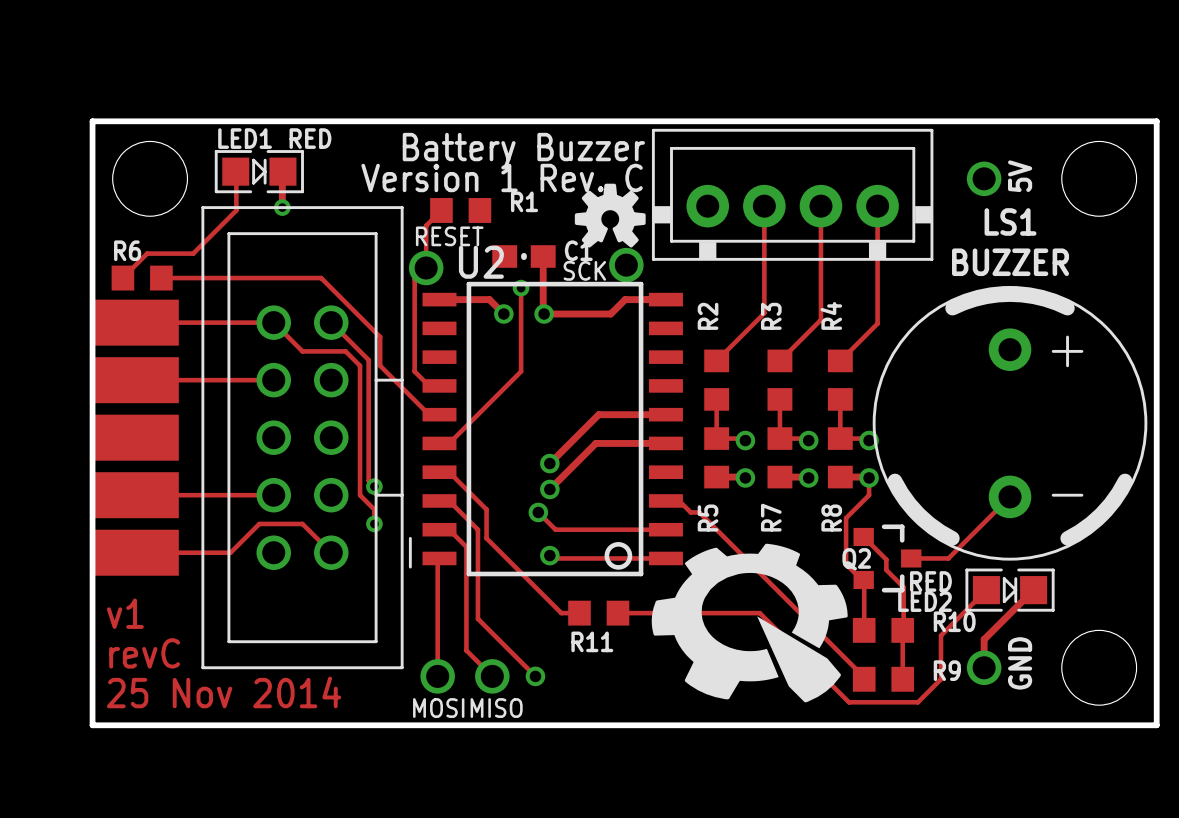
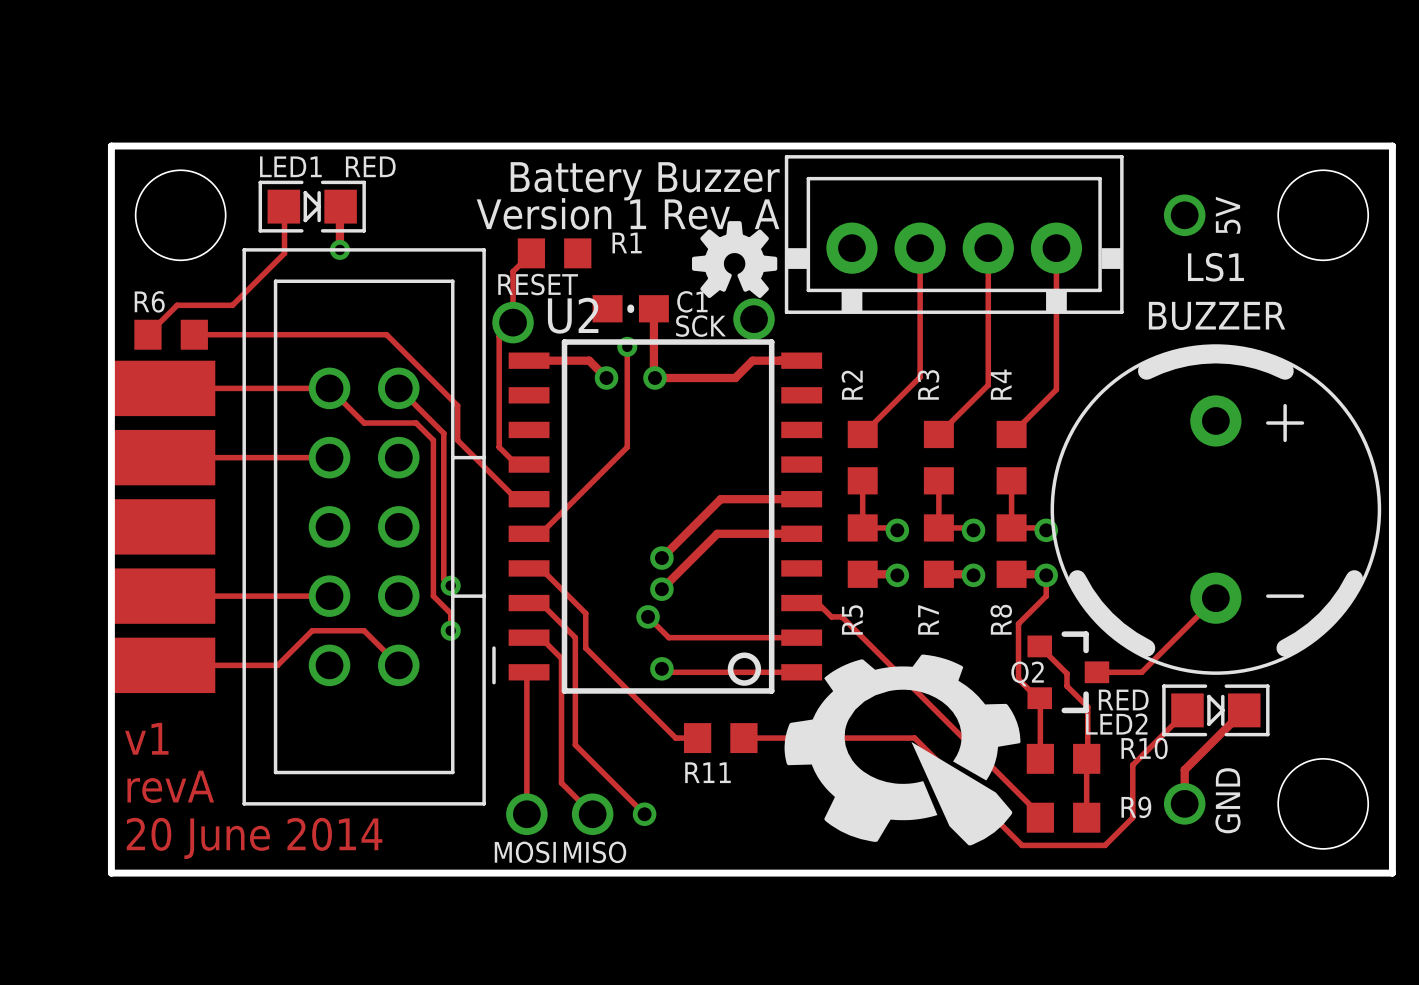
text: Version 1 Rev. C (502, 177) -> Version 1 Rev. A (628, 213)
text: revC (144, 653) -> revA (170, 786)
text: 25 Nov 2014 (224, 692) -> 20 June 2014 (254, 838)

